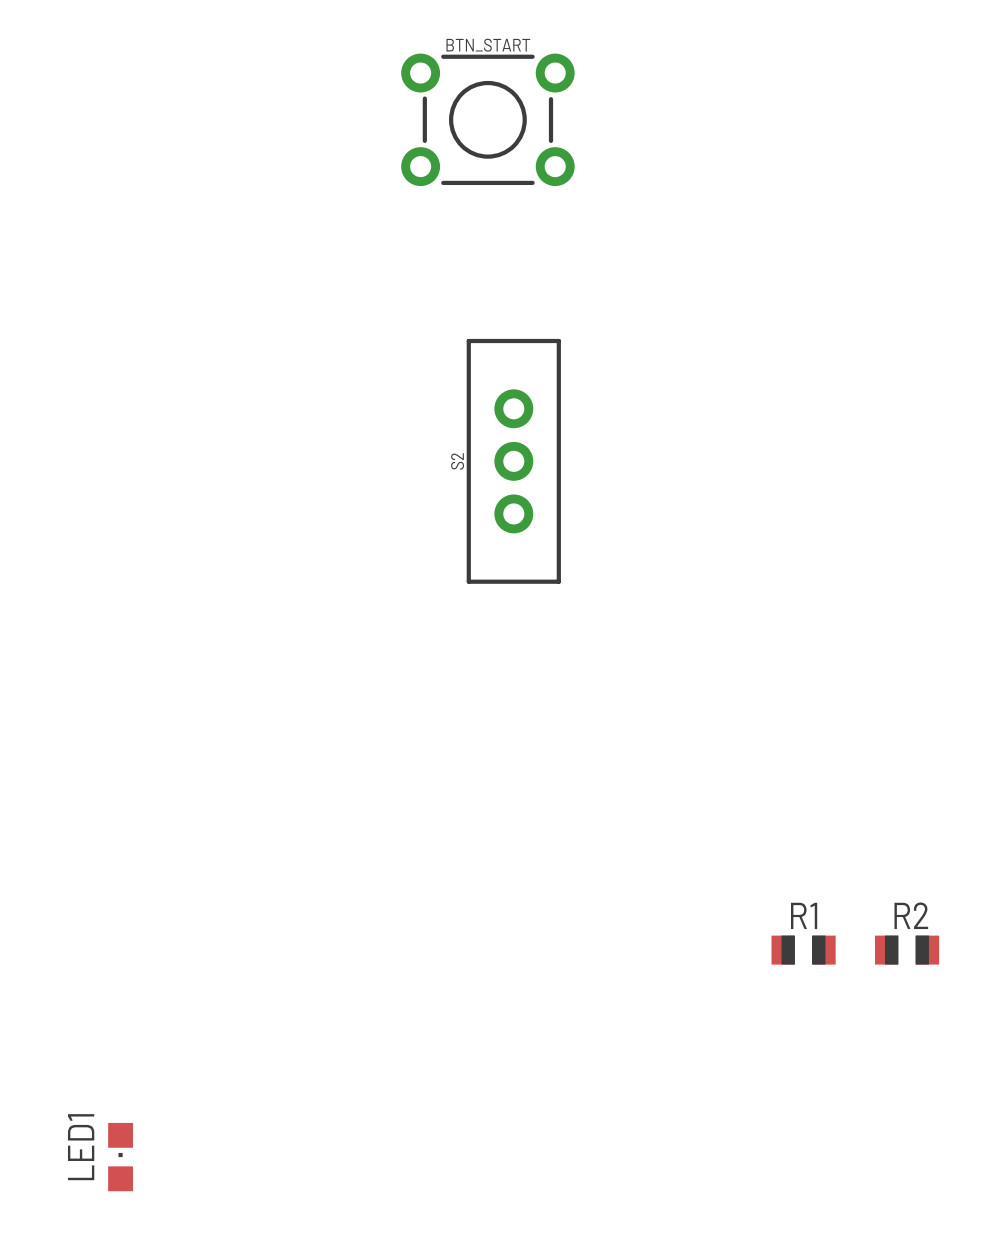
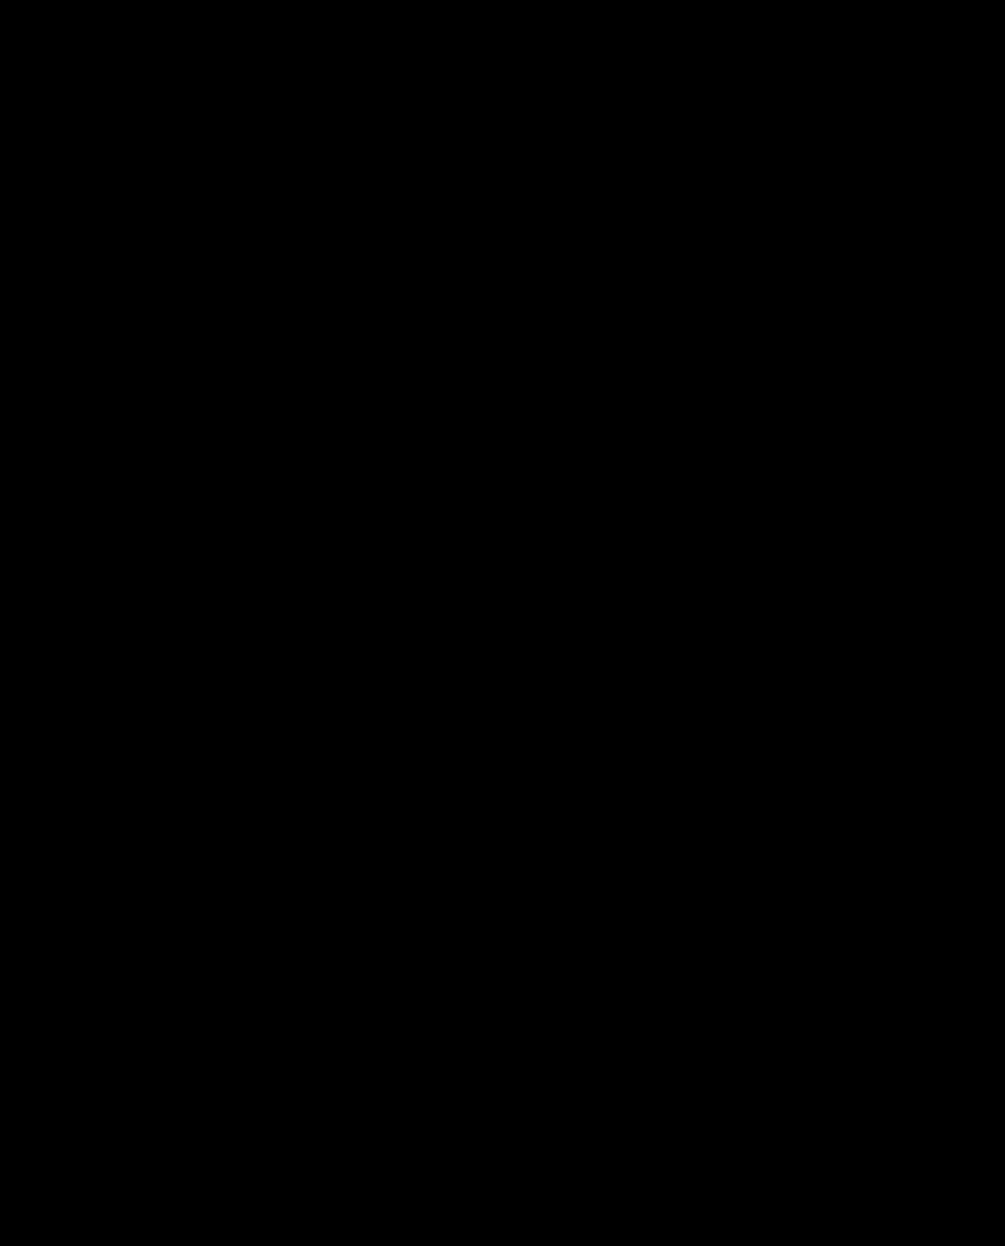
BTN_START: (487, 119) -> none
S2: (513, 461) -> none
R1: (803, 950) -> none
R2: (907, 950) -> none
LED1: (120, 1157) -> none

